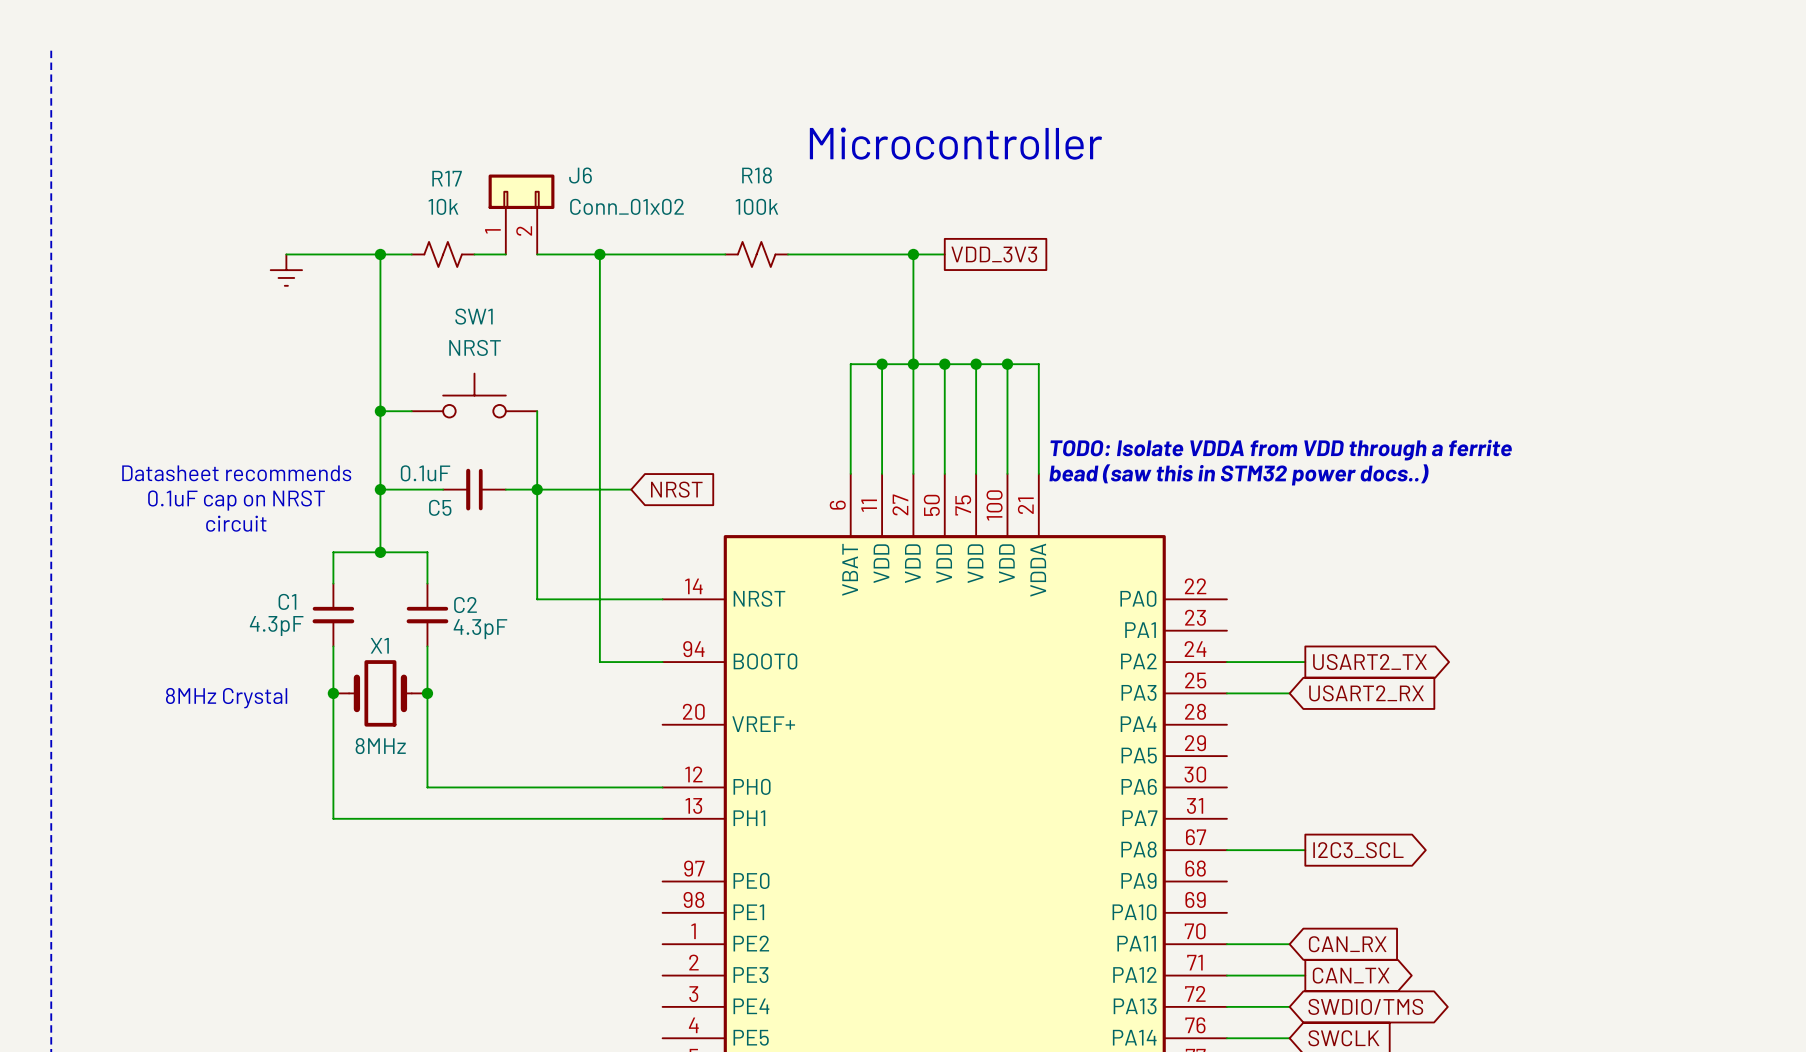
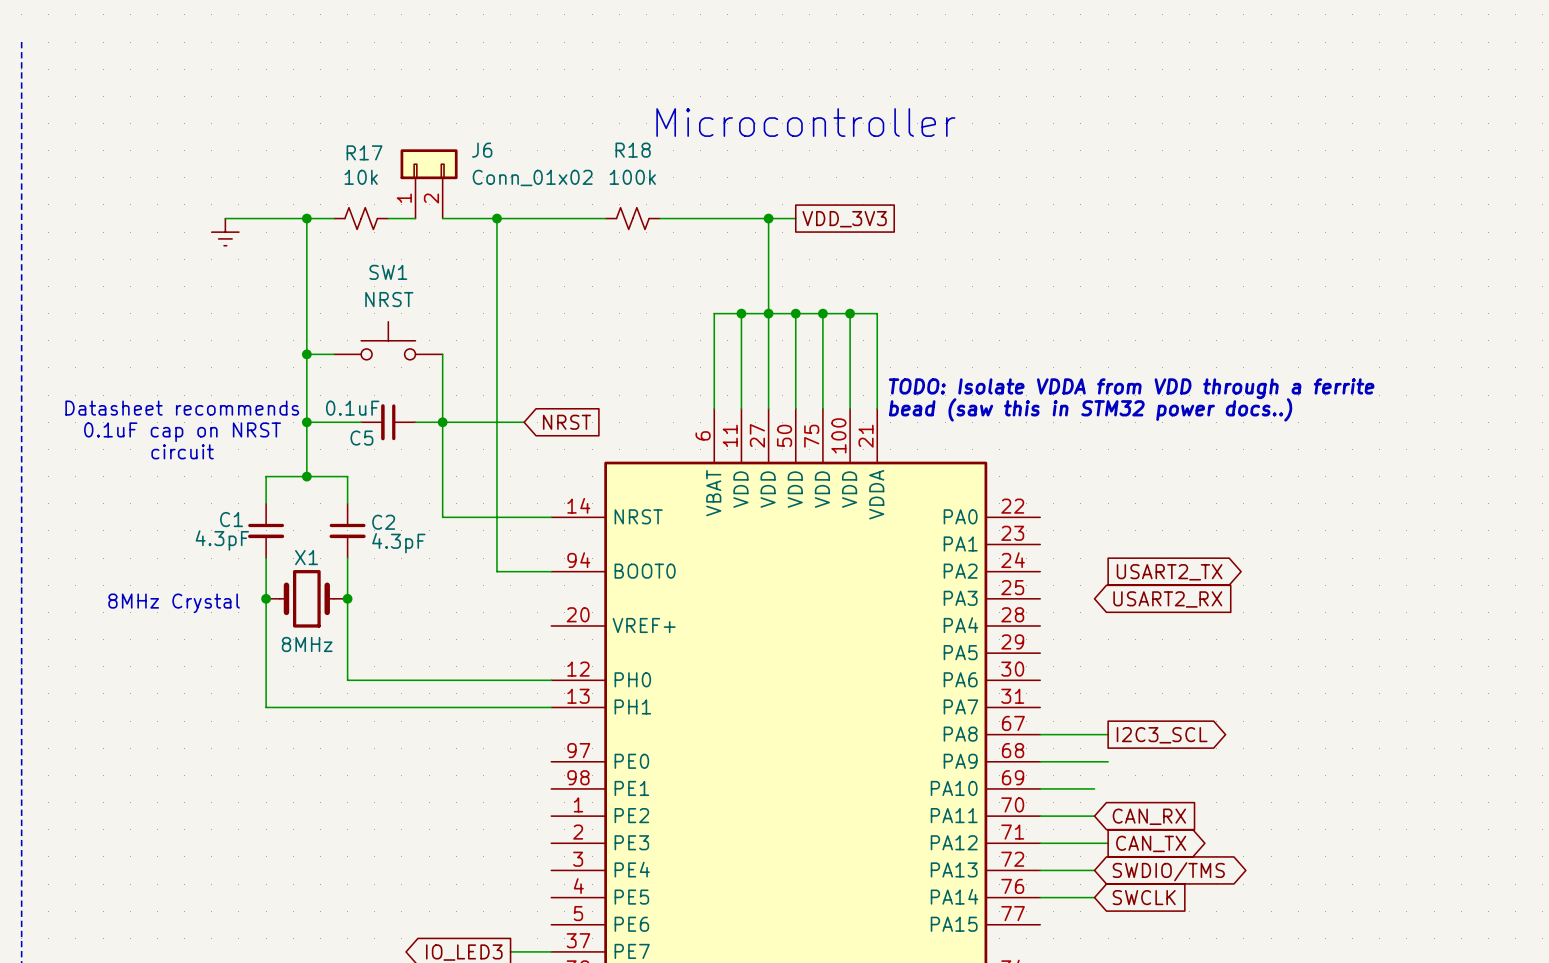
wire: (1226, 662) (1305, 662) -> (1040, 761) (1108, 761)
wire: (1226, 693) (1289, 693) -> (1040, 788) (1094, 788)

